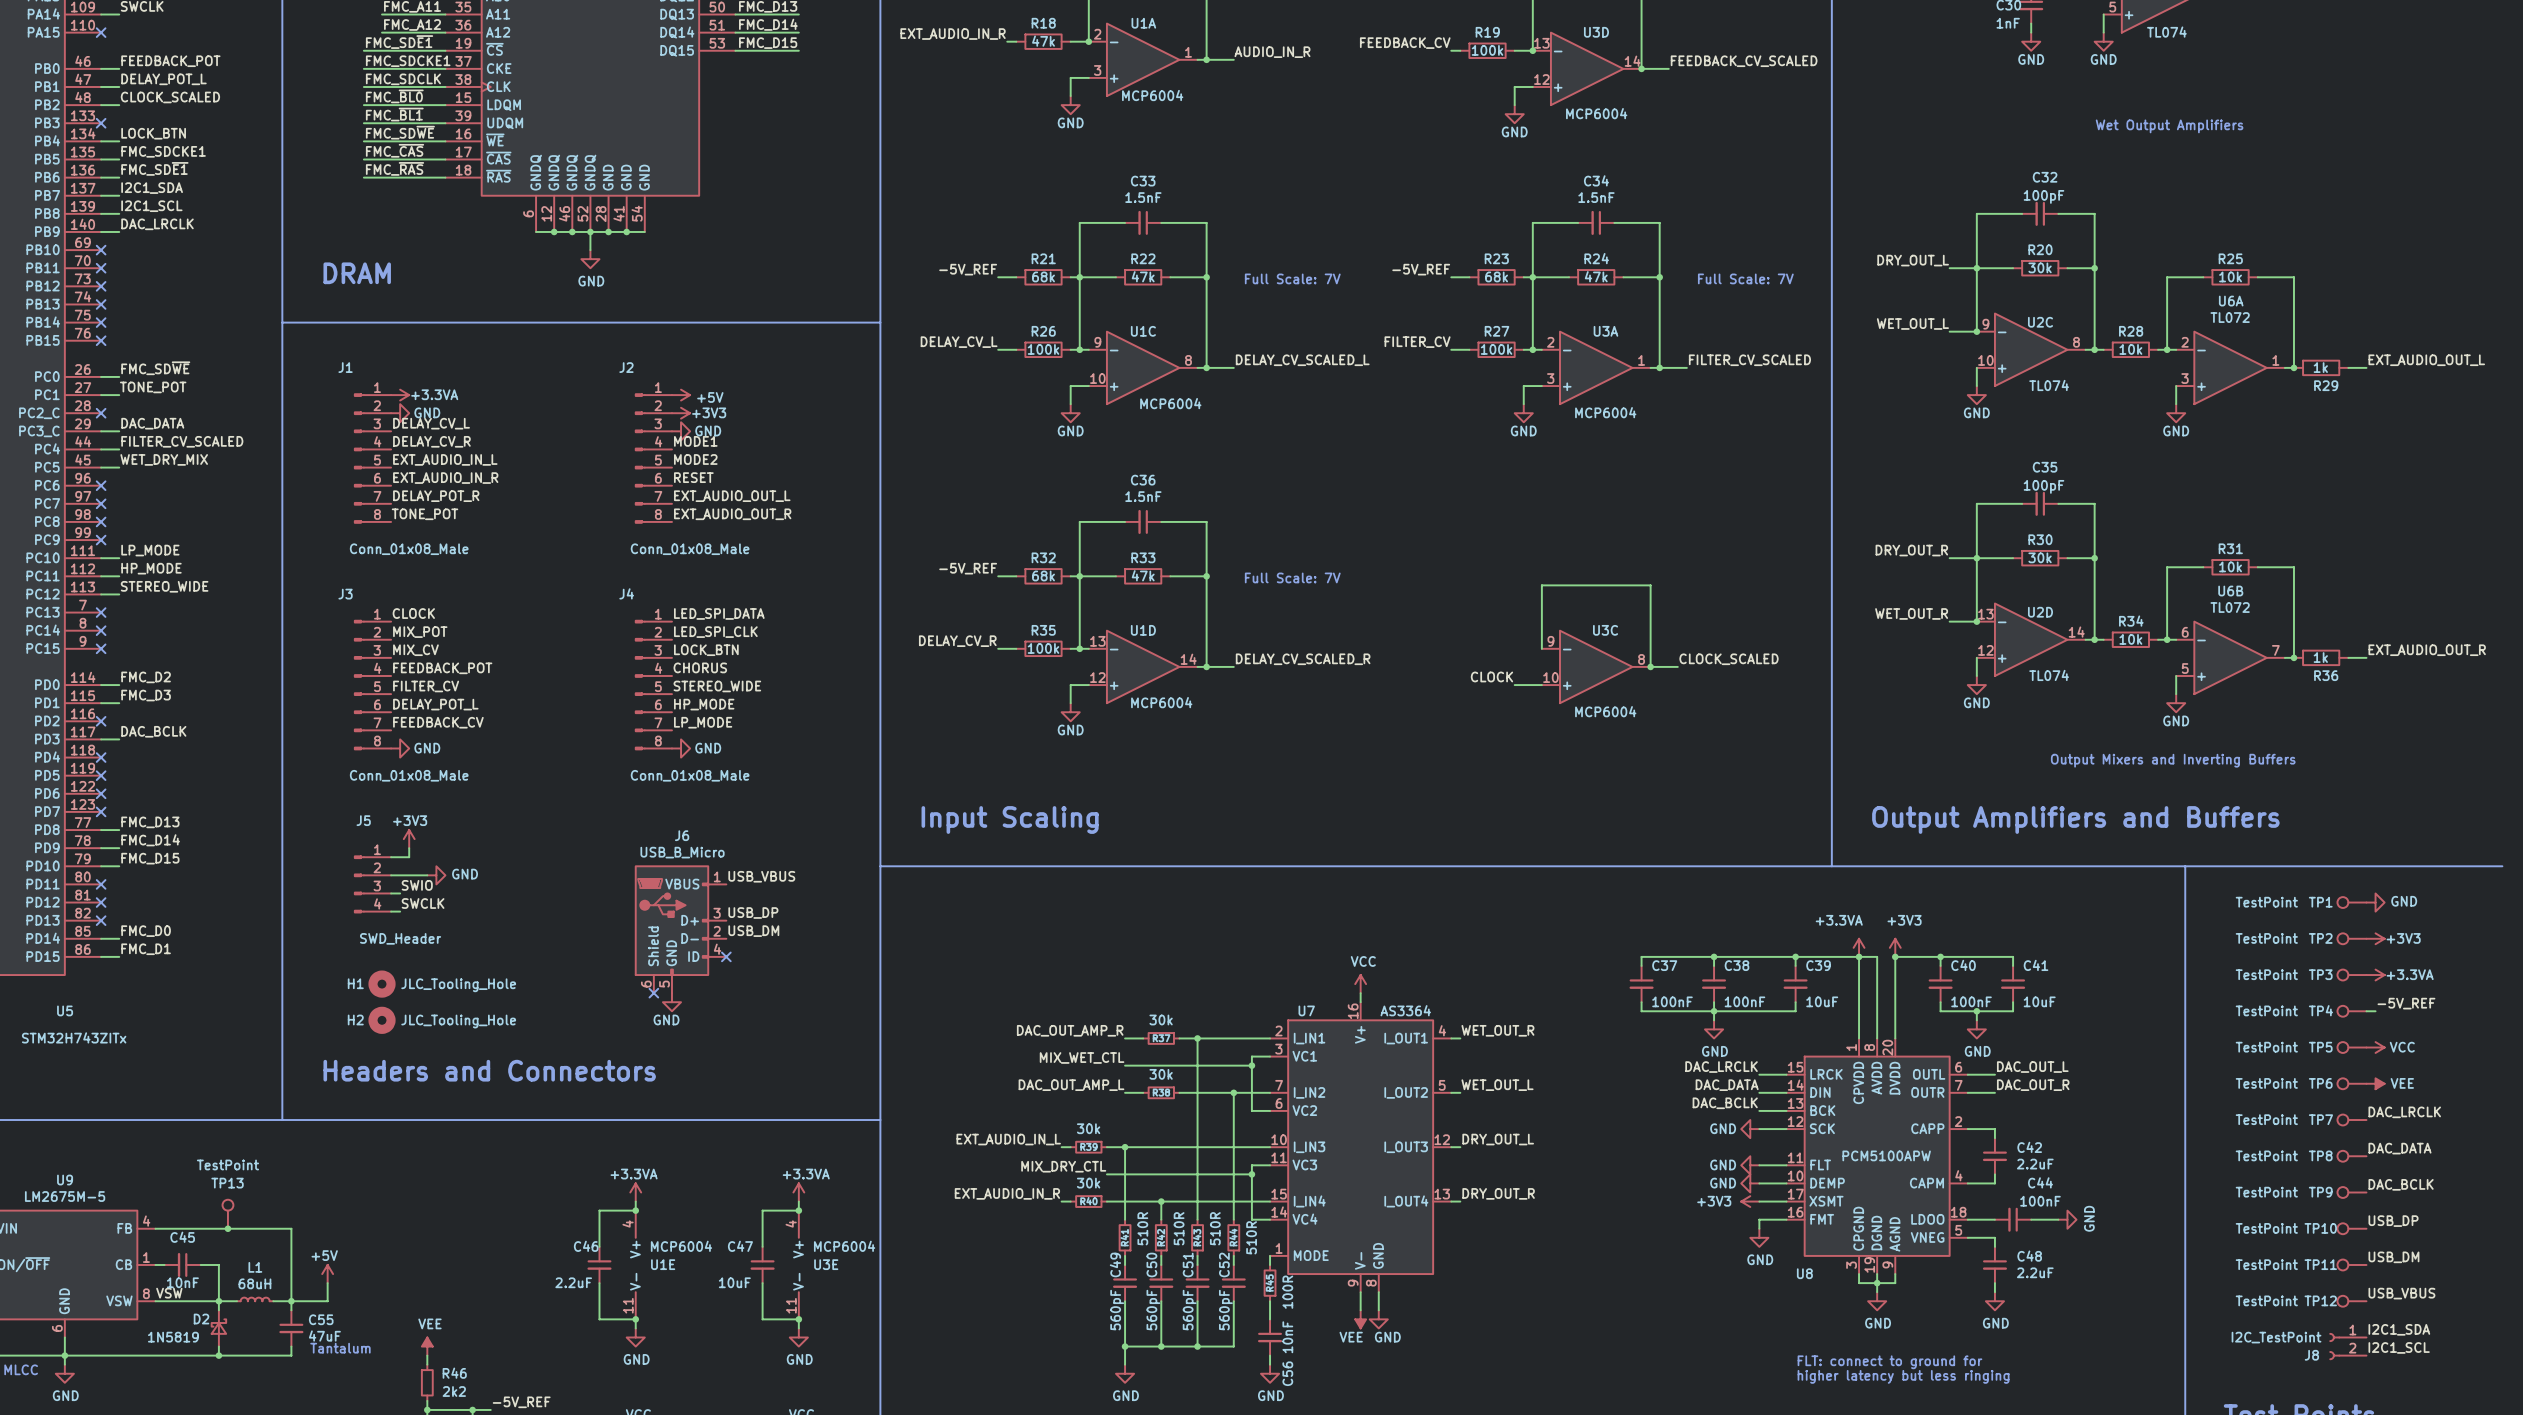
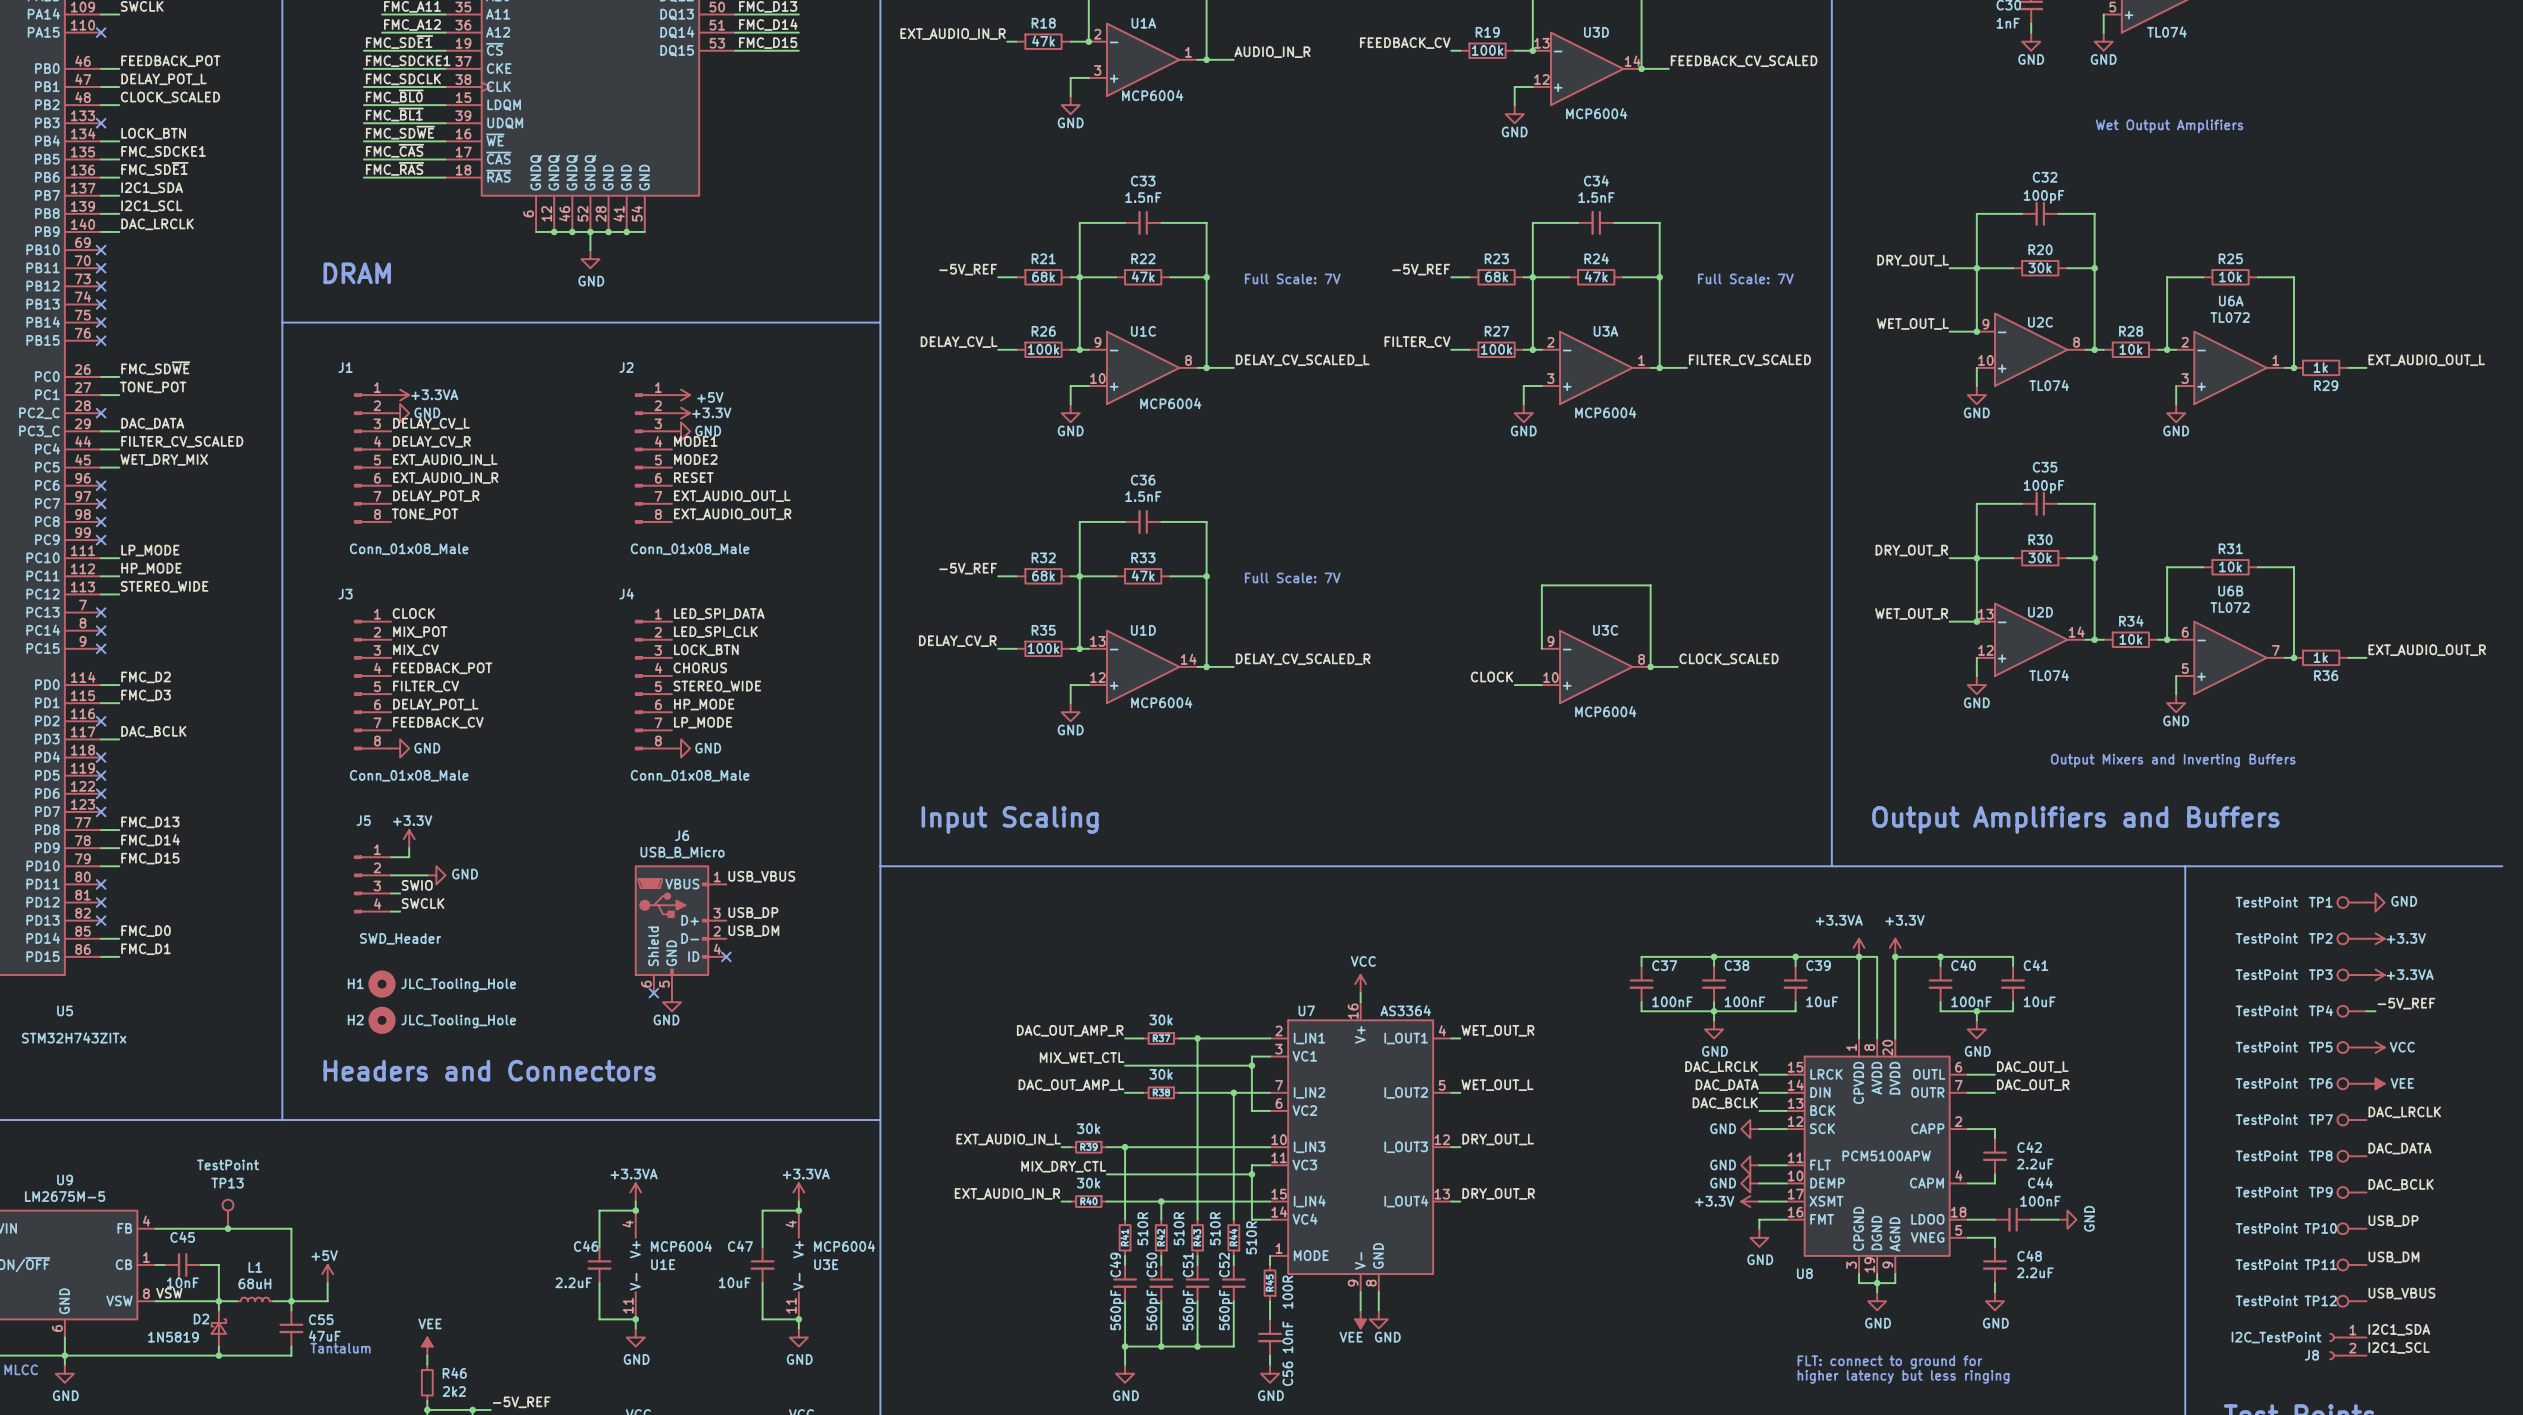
power symbol: +3V3 (681, 413) -> +3.3V (681, 413)
power symbol: +3V3 (409, 839) -> +3.3V (409, 839)
power symbol: +3V3 (2375, 938) -> +3.3V (2375, 938)
power symbol: +3V3 (1895, 947) -> +3.3V (1895, 947)
power symbol: +3V3 (1750, 1201) -> +3.3V (1750, 1201)

